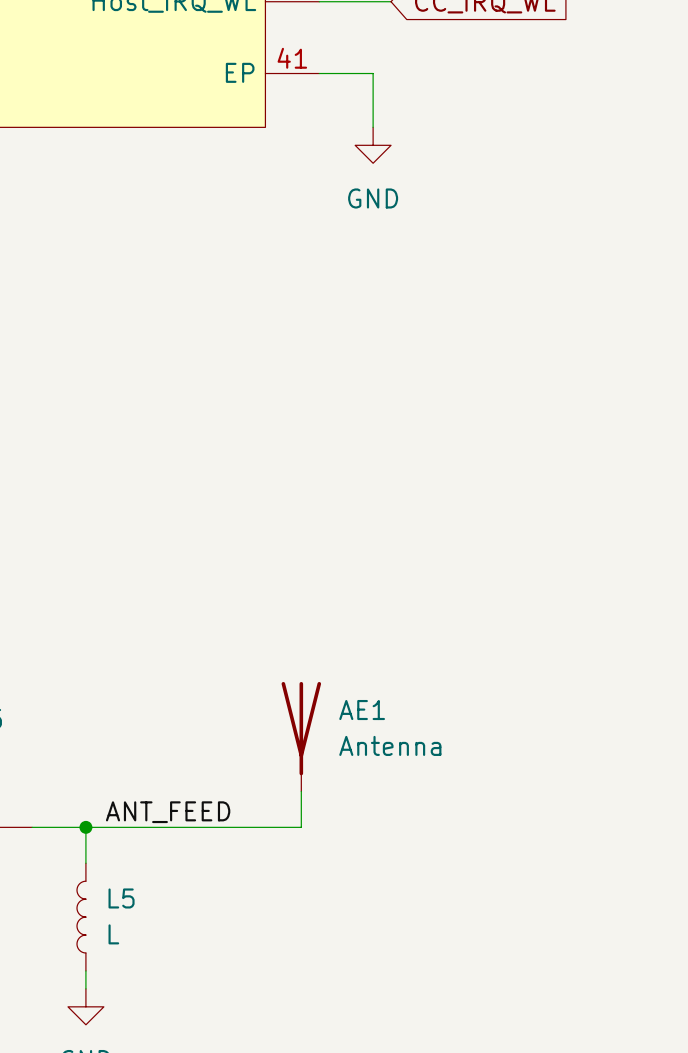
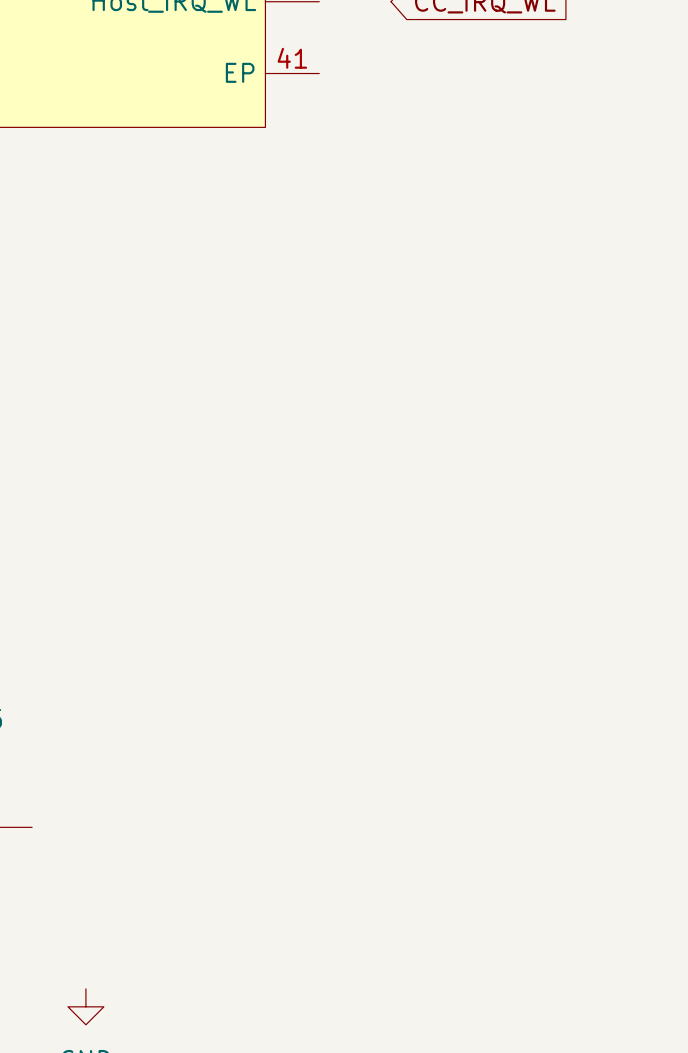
wire: (319, 1) (391, 1) -> none
wire: (319, 73) (373, 73) (373, 127) -> none
power symbol: GND (373, 145) -> none
AE1: Antenna (301, 736) -> none
wire: (301, 791) (301, 827) (32, 827) -> none
label: ANT_FEED (168, 812) -> none
wire: (85, 827) (85, 863) -> none
junction: (85, 827) -> none
L5: L (81, 917) -> none
wire: (85, 970) (85, 988) -> none

